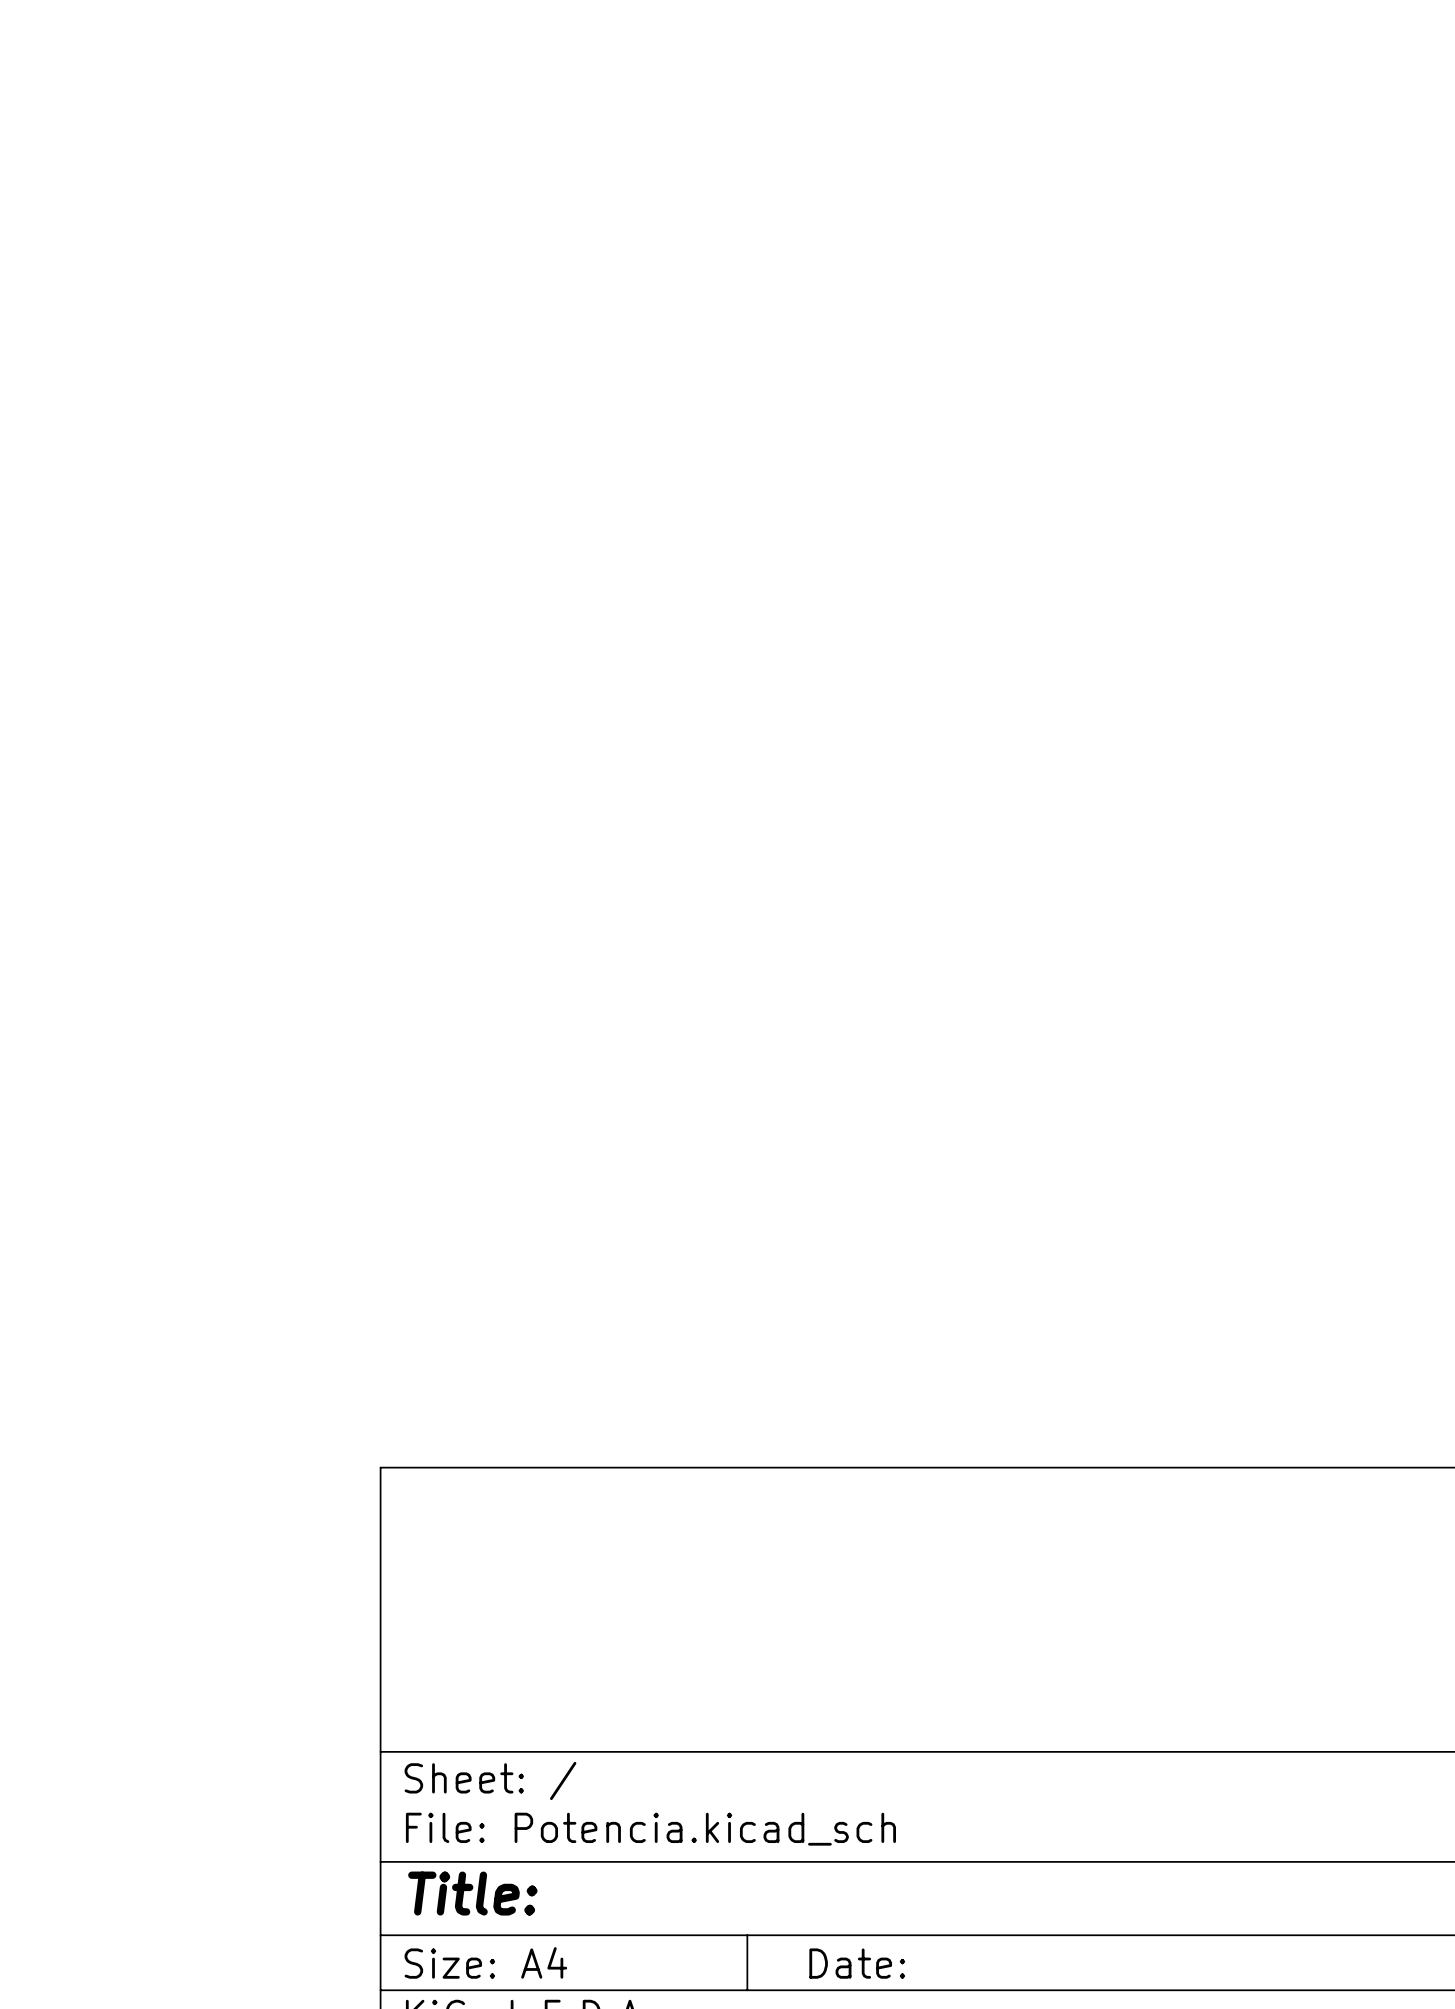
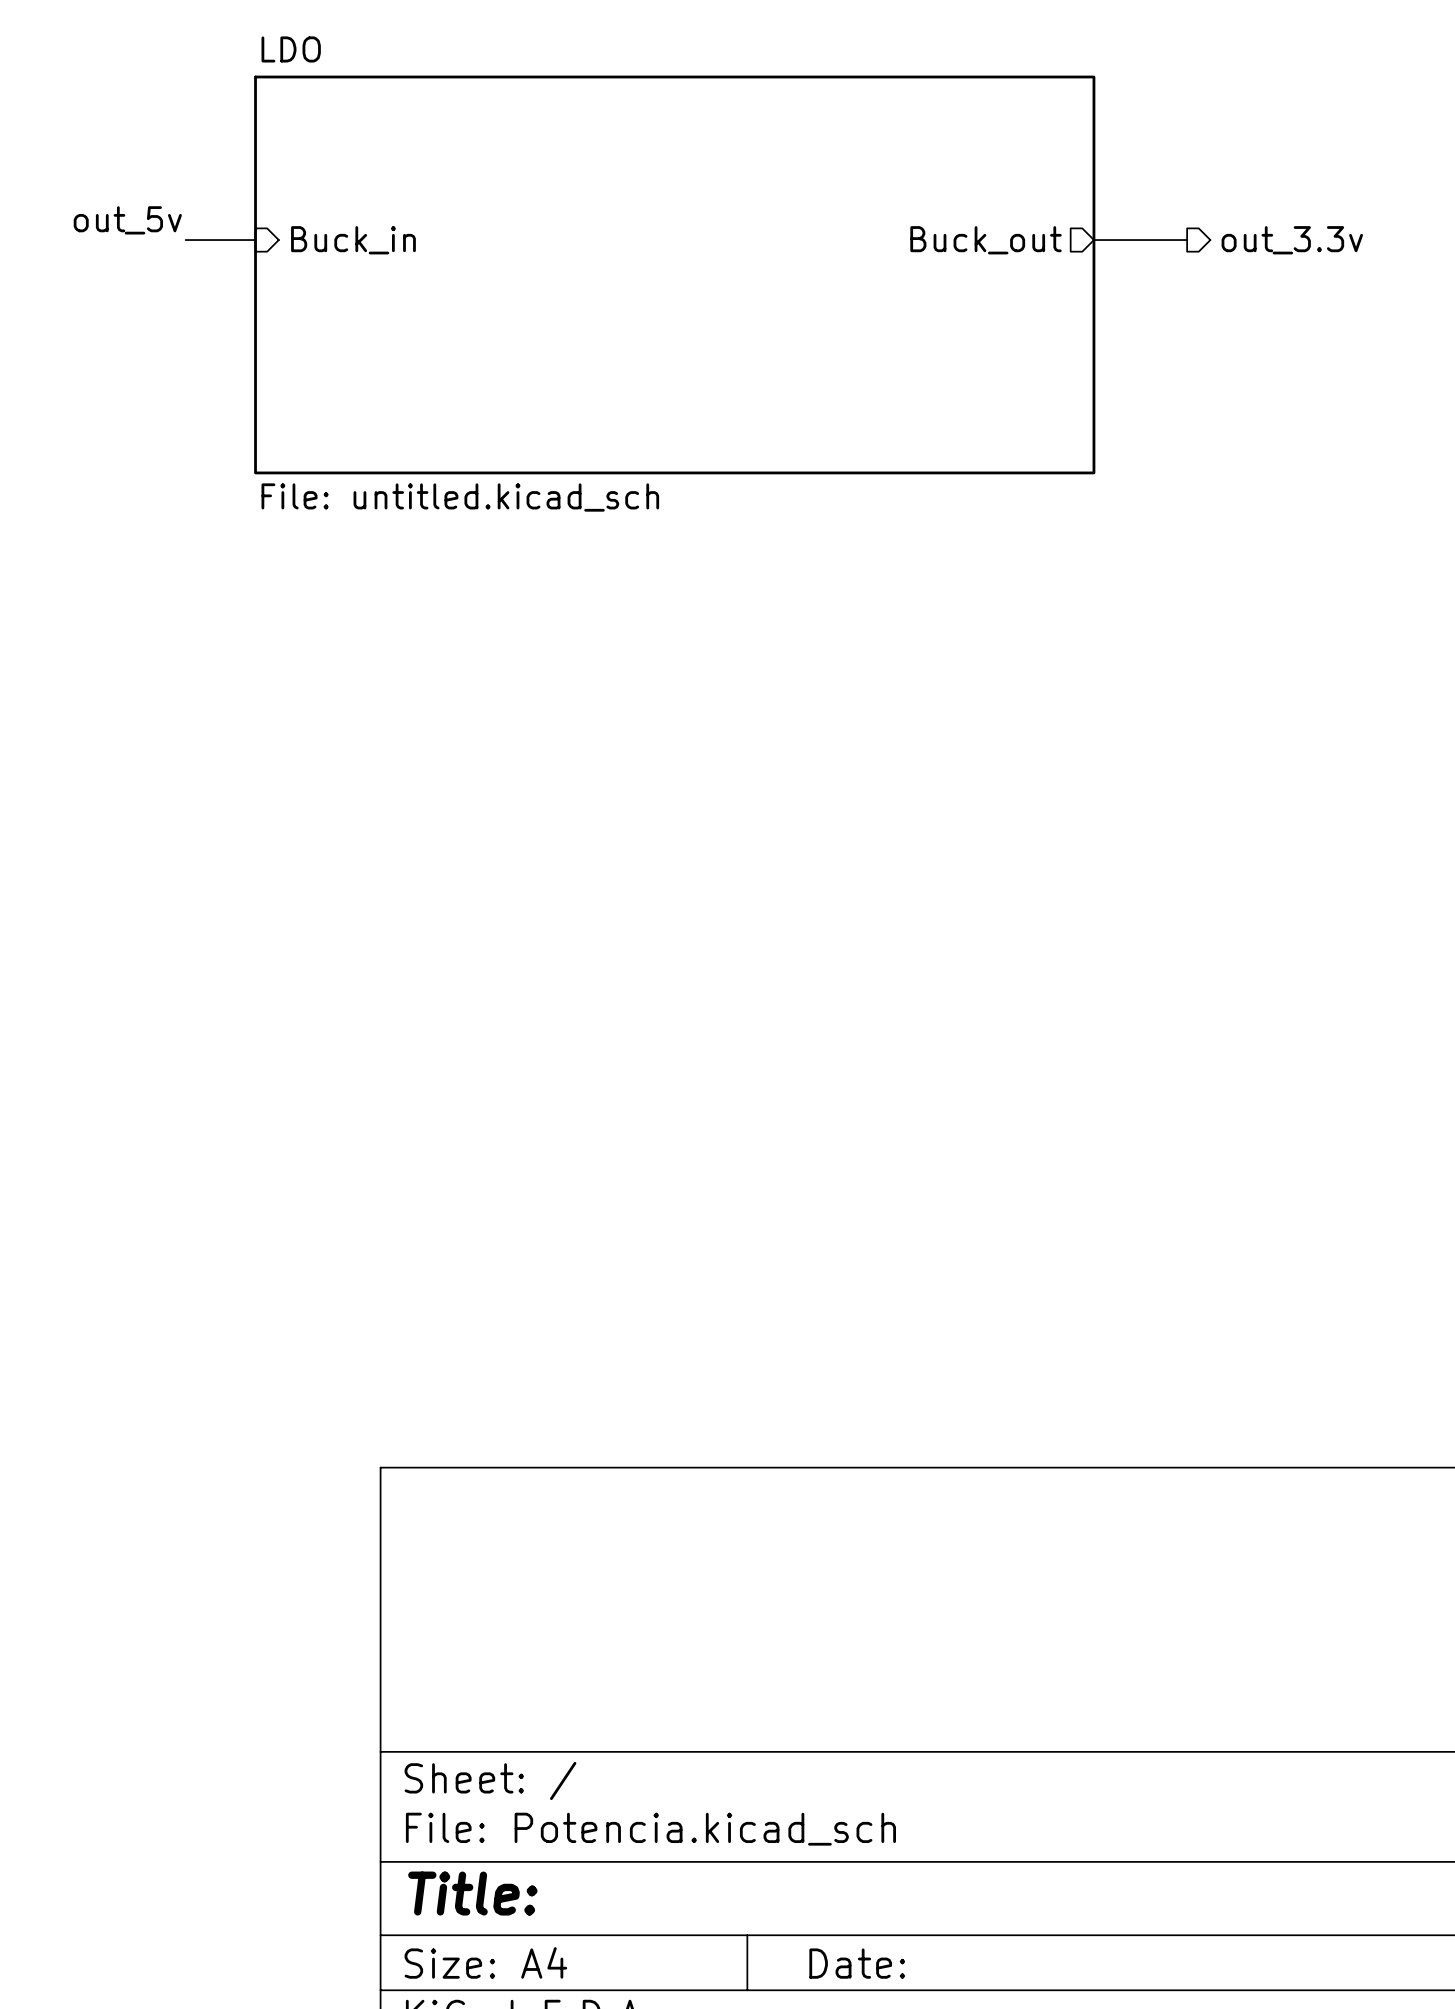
label: none -> out_5v (127, 220)
wire: none -> (185, 240) (255, 240)
sheet pin: none -> Buck_in (353, 240)
sheet pin: none -> Buck_out (986, 240)
wire: none -> (1093, 240) (1187, 240)
hierarchical label: none -> out_3.3v (1292, 240)
sheet LDO: none -> File: untitled.kicad_sch (674, 274)

